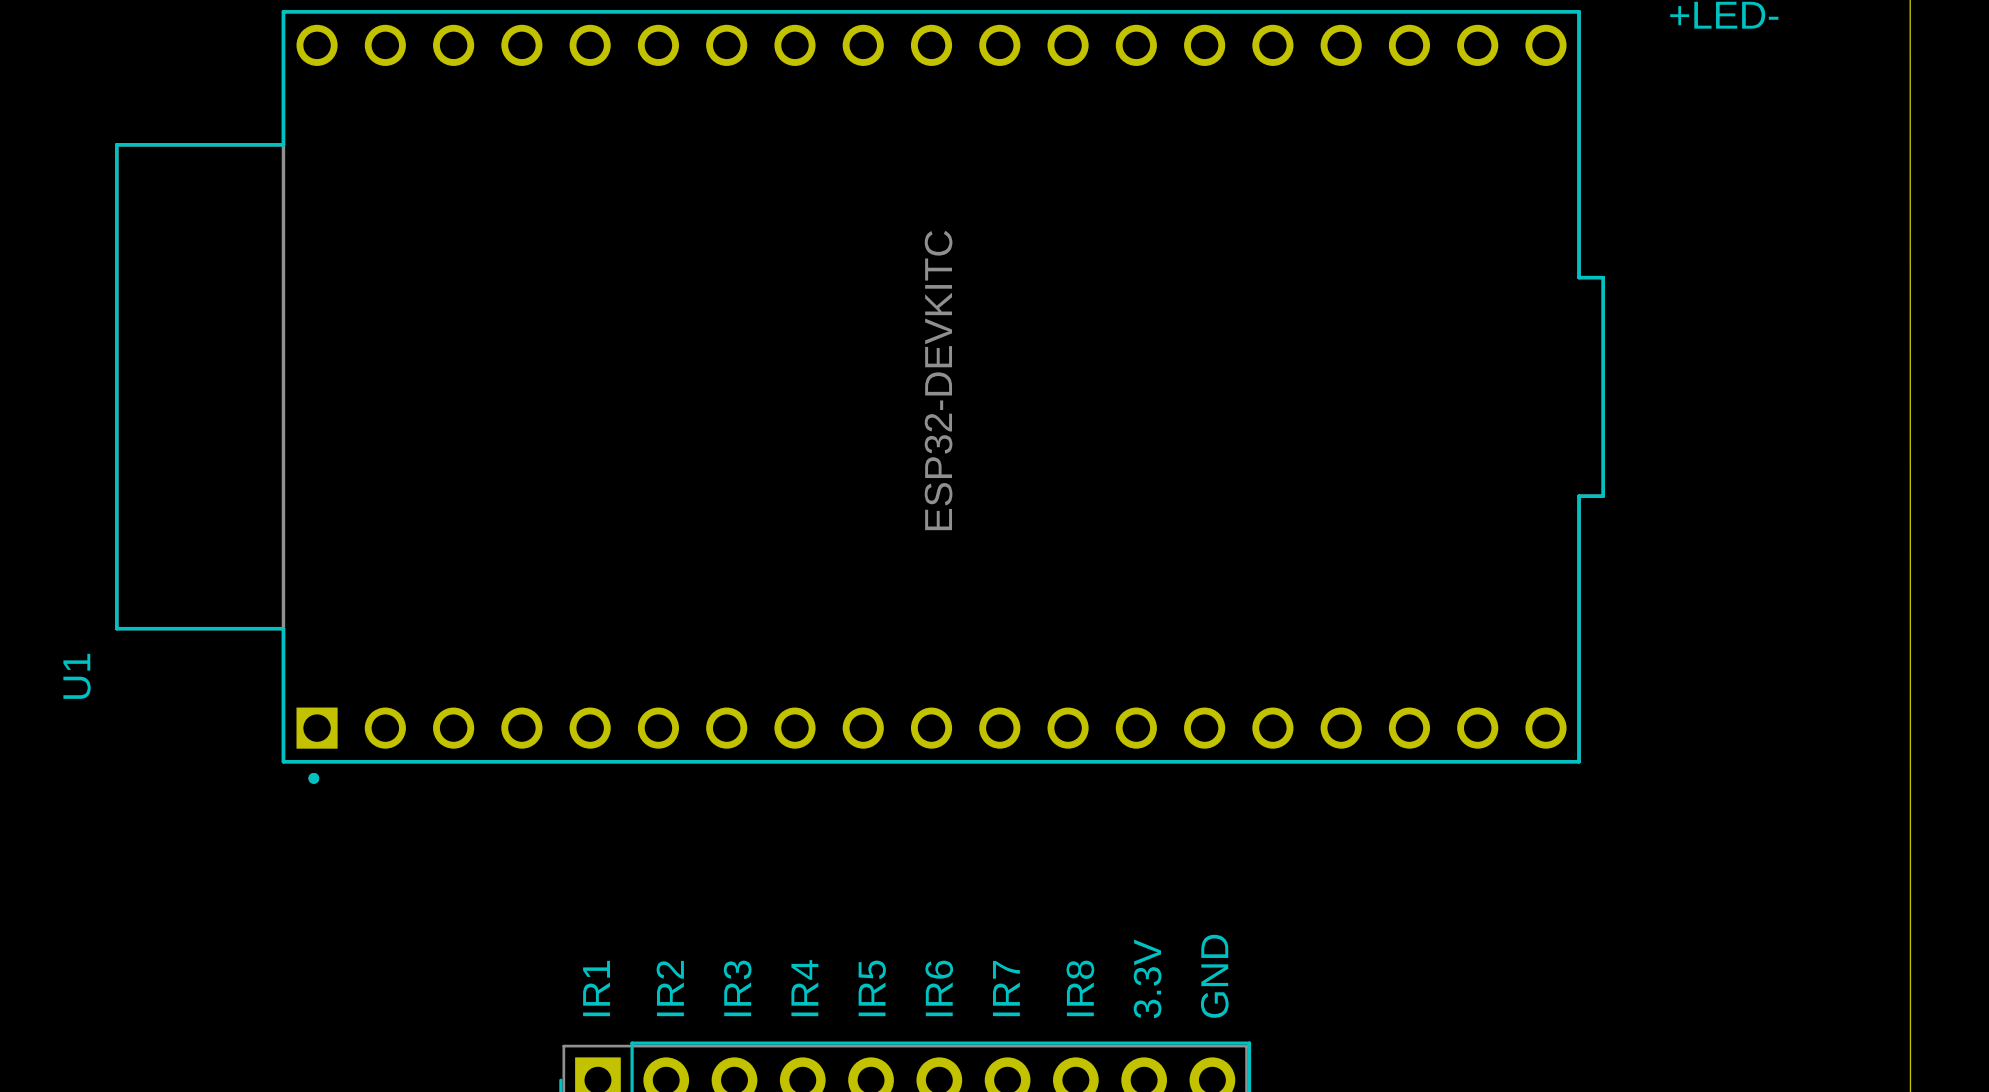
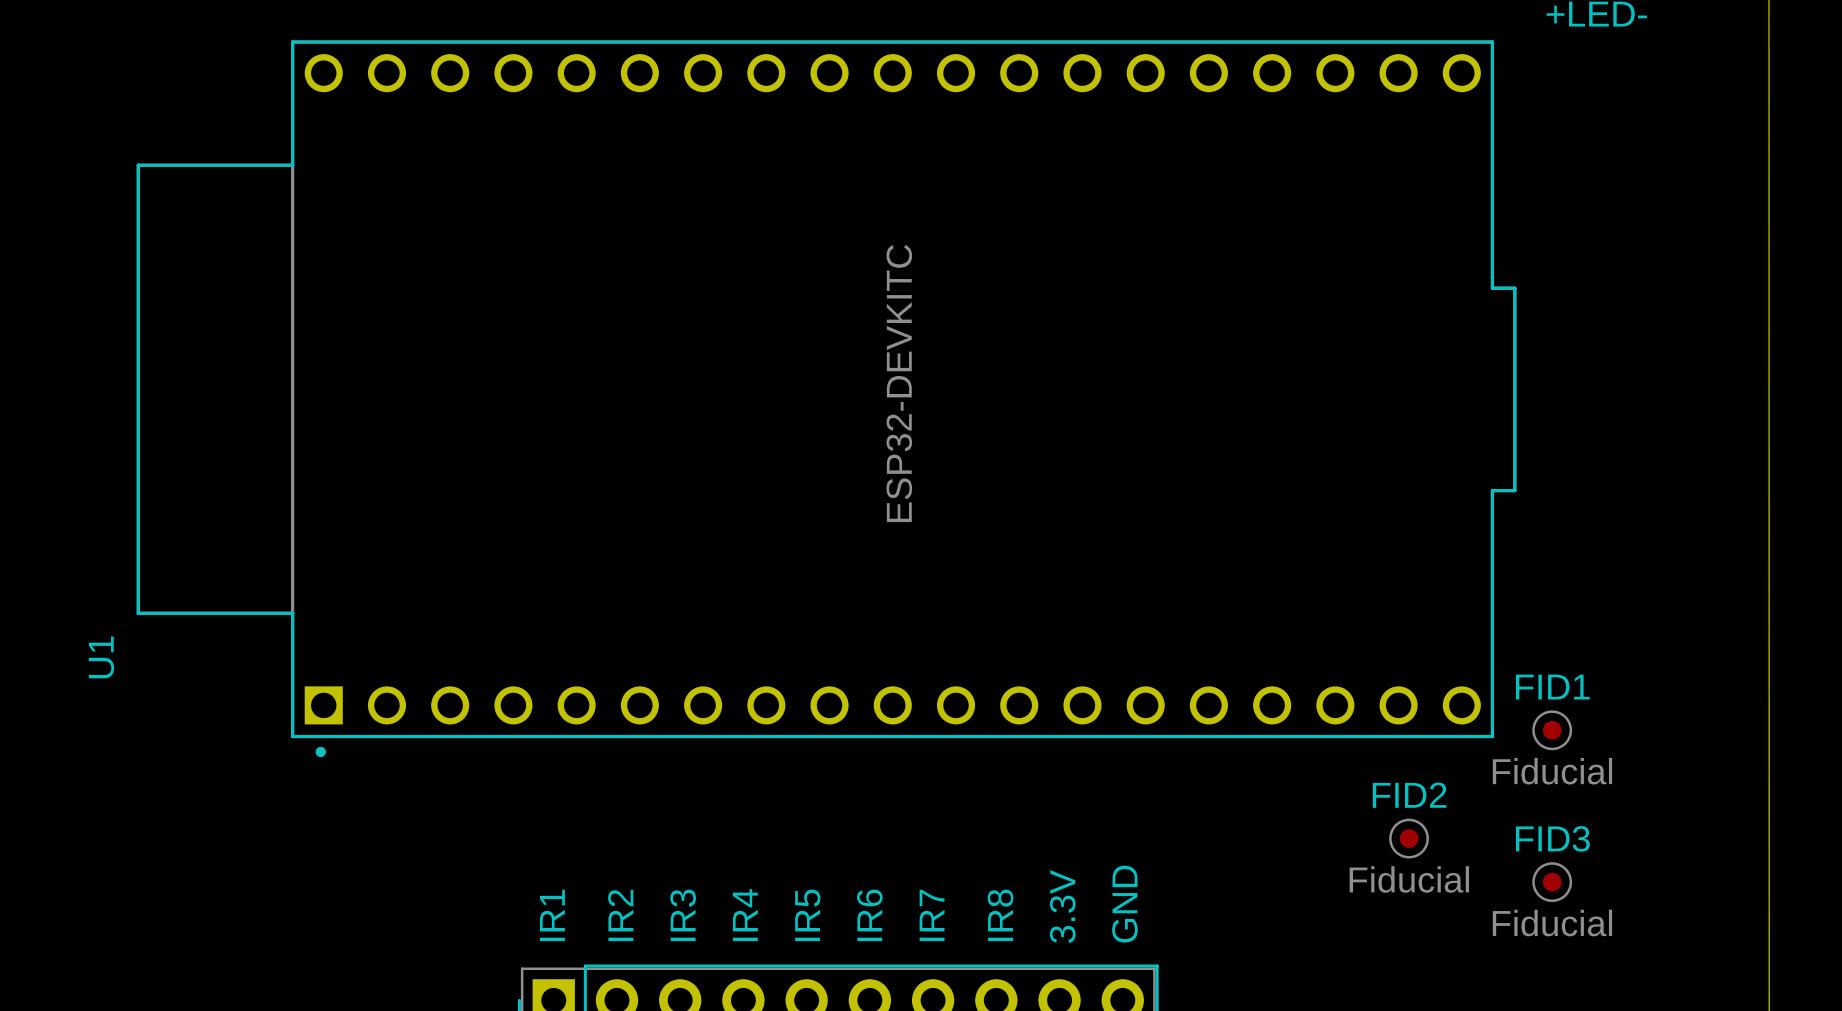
U1 position: (860, 396) -> (826, 398)
FID1: none -> Fiducial (1552, 730)
FID2: none -> Fiducial (1409, 838)
FID3: none -> Fiducial (1552, 882)

